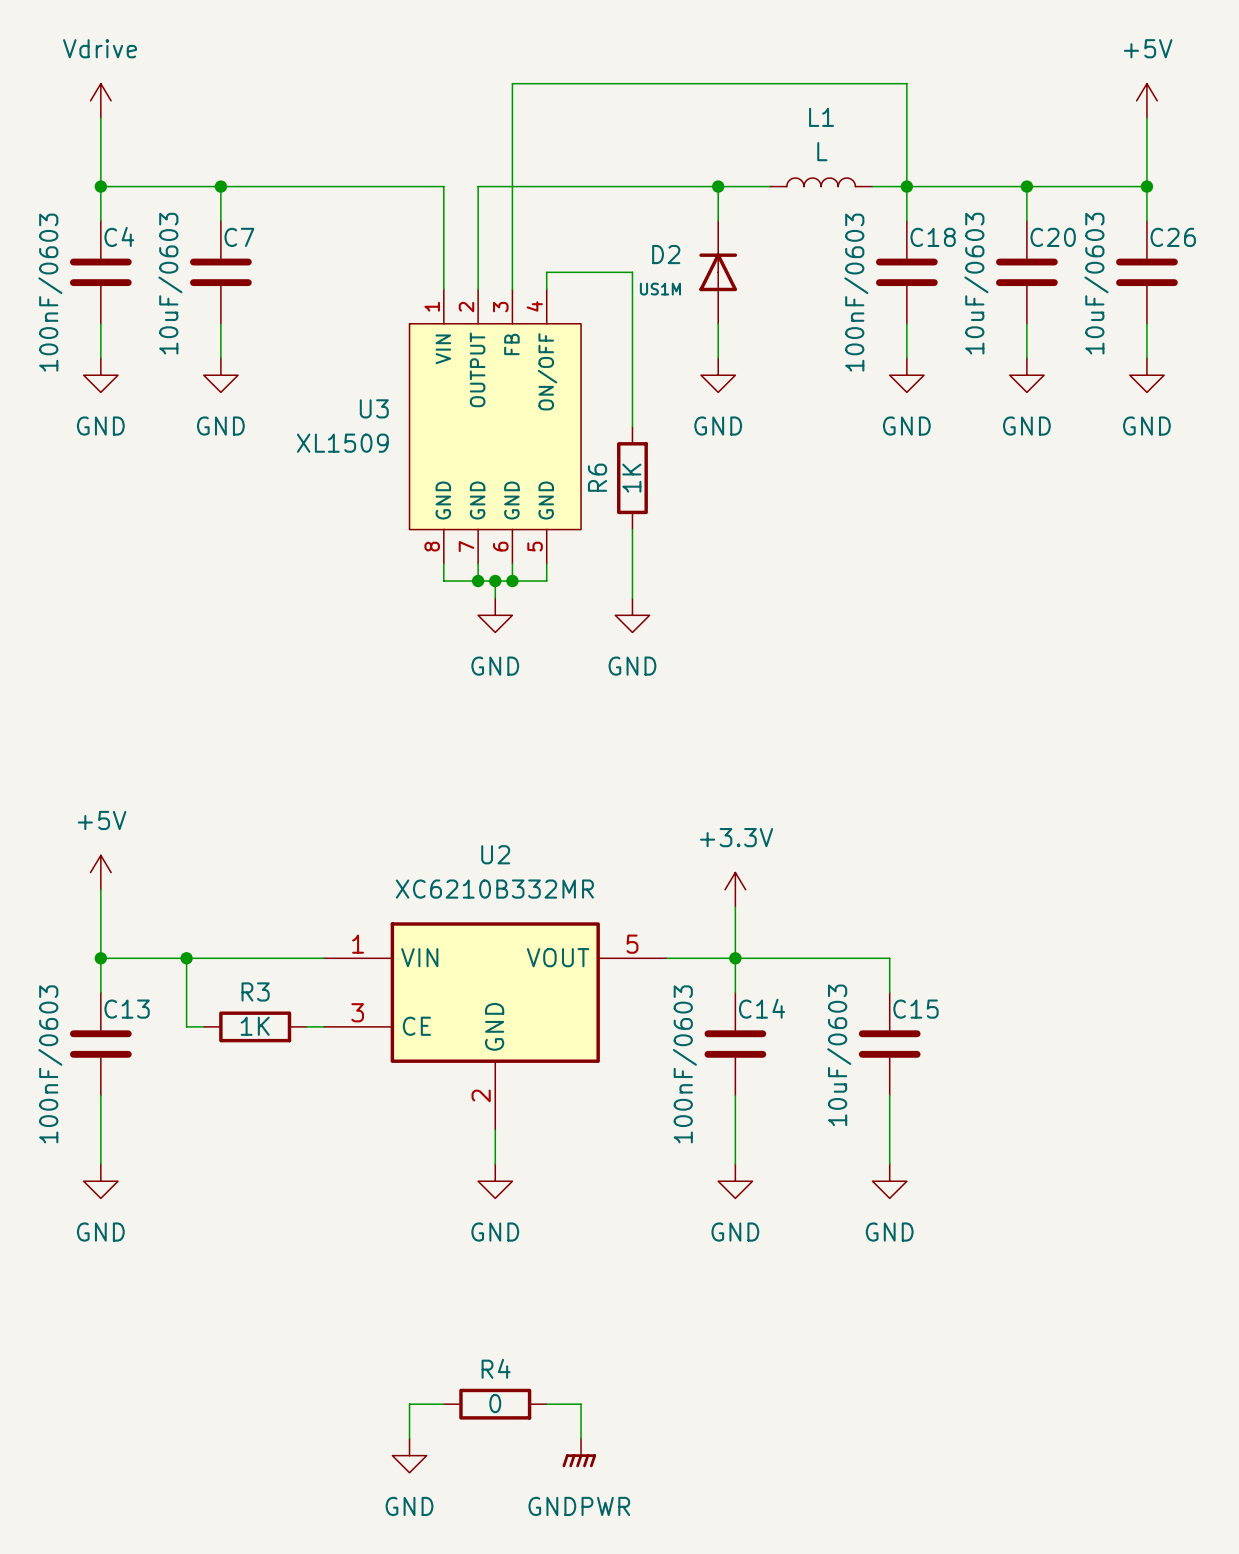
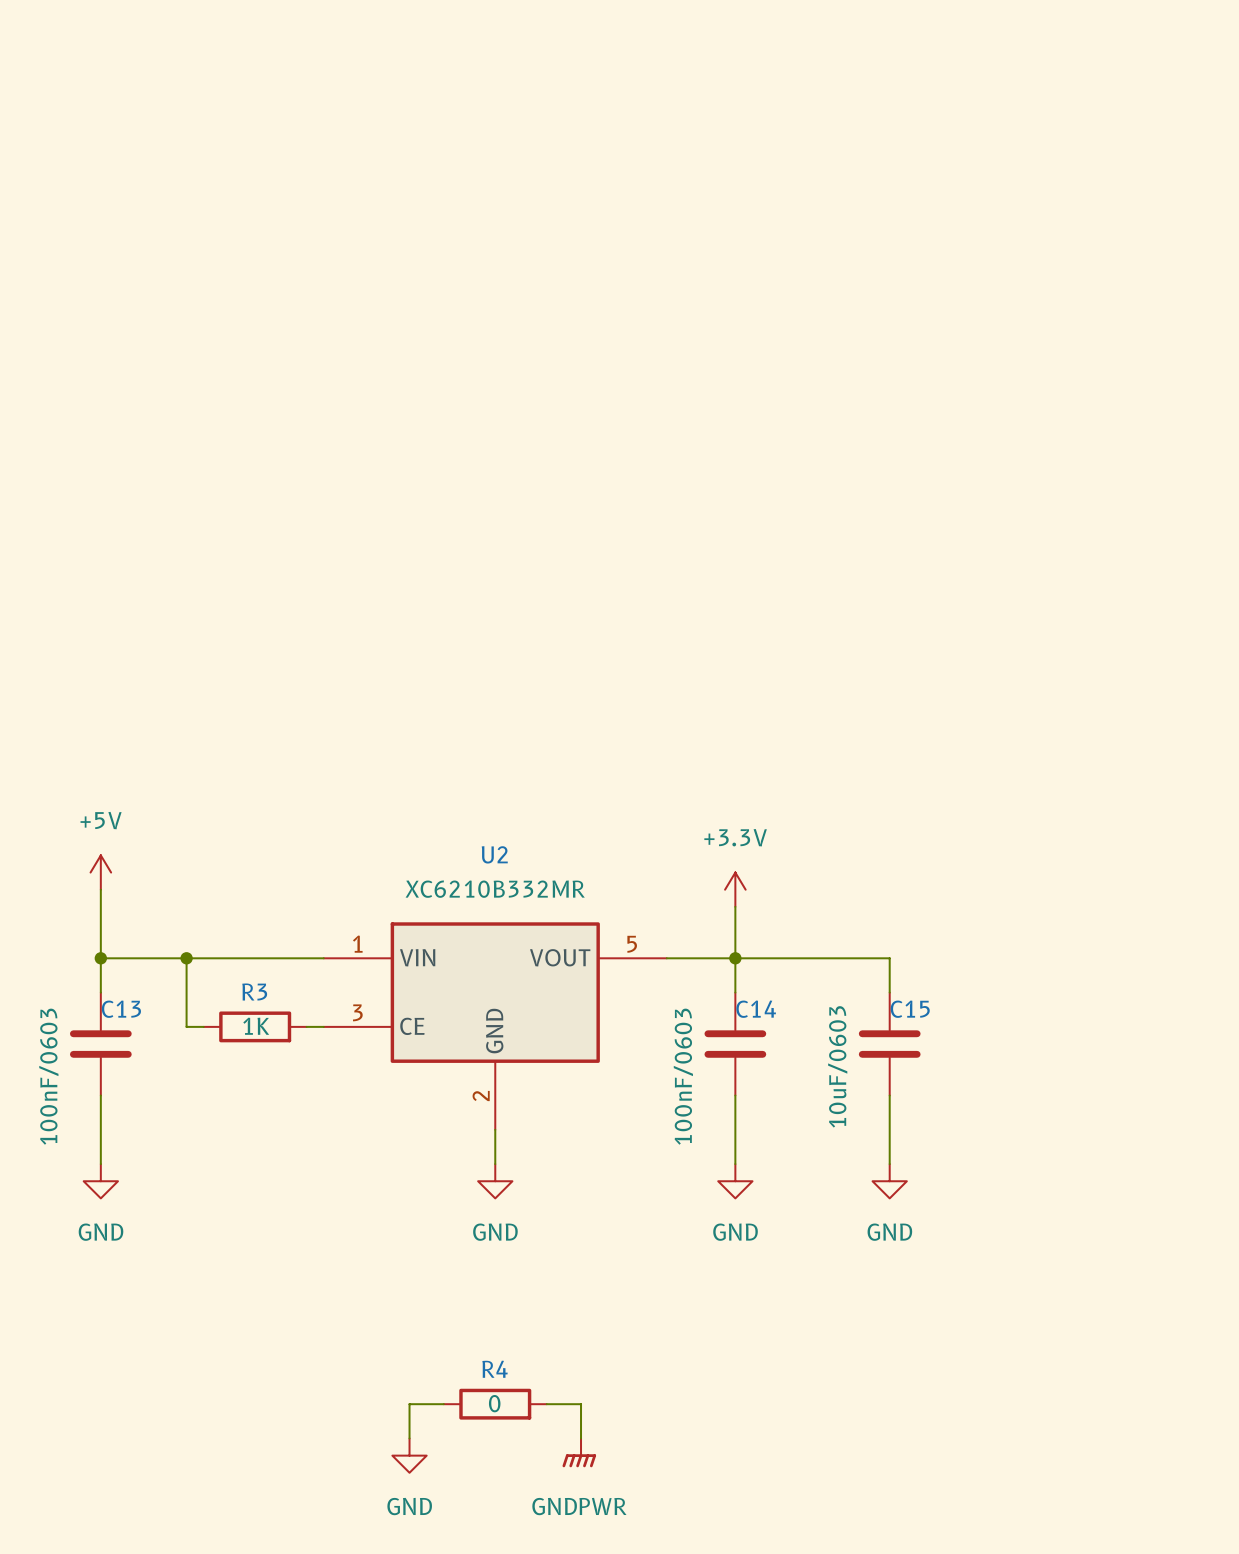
power symbol: Vdrive (100, 100) -> none
power symbol: +5V (1146, 100) -> none
wire: (100, 117) (100, 220) -> none
wire: (1146, 117) (1146, 220) -> none
L1: L (821, 182) -> none
wire: (100, 186) (443, 186) (443, 289) -> none
junction: (100, 186) -> none
wire: (220, 186) (220, 220) -> none
junction: (220, 186) -> none
wire: (718, 186) (718, 220) -> none
junction: (718, 186) -> none
wire: (769, 186) (478, 186) (478, 289) -> none
wire: (872, 186) (1146, 186) -> none
junction: (906, 186) -> none
wire: (1026, 186) (1026, 220) -> none
junction: (1026, 186) -> none
junction: (1146, 186) -> none
wire: (906, 220) (906, 83) (512, 83) (512, 289) -> none
C4: 100nF/0603 (100, 272) -> none
C7: 10uF/0603 (220, 272) -> none
D2: US1M (718, 272) -> none
C18: 100nF/0603 (906, 272) -> none
C20: 10uF/0603 (1026, 272) -> none
C26: 10uF/0603 (1146, 272) -> none
wire: (546, 289) (546, 272) (632, 272) (632, 426) -> none
wire: (100, 323) (100, 358) -> none
wire: (220, 323) (220, 358) -> none
wire: (718, 323) (718, 358) -> none
wire: (906, 323) (906, 358) -> none
wire: (1026, 323) (1026, 358) -> none
wire: (1146, 323) (1146, 358) -> none
power symbol: GND (100, 375) -> none
power symbol: GND (220, 375) -> none
power symbol: GND (718, 375) -> none
power symbol: GND (906, 375) -> none
power symbol: GND (1026, 375) -> none
power symbol: GND (1146, 375) -> none
U3: XL1509 (495, 426) -> none
R6: 1K (632, 478) -> none
wire: (632, 529) (632, 598) -> none
wire: (443, 563) (443, 581) (546, 581) (546, 563) -> none
wire: (478, 563) (478, 581) -> none
wire: (512, 563) (512, 581) -> none
junction: (478, 581) -> none
wire: (495, 581) (495, 598) -> none
junction: (495, 581) -> none
junction: (512, 581) -> none
power symbol: GND (495, 615) -> none
power symbol: GND (632, 615) -> none

